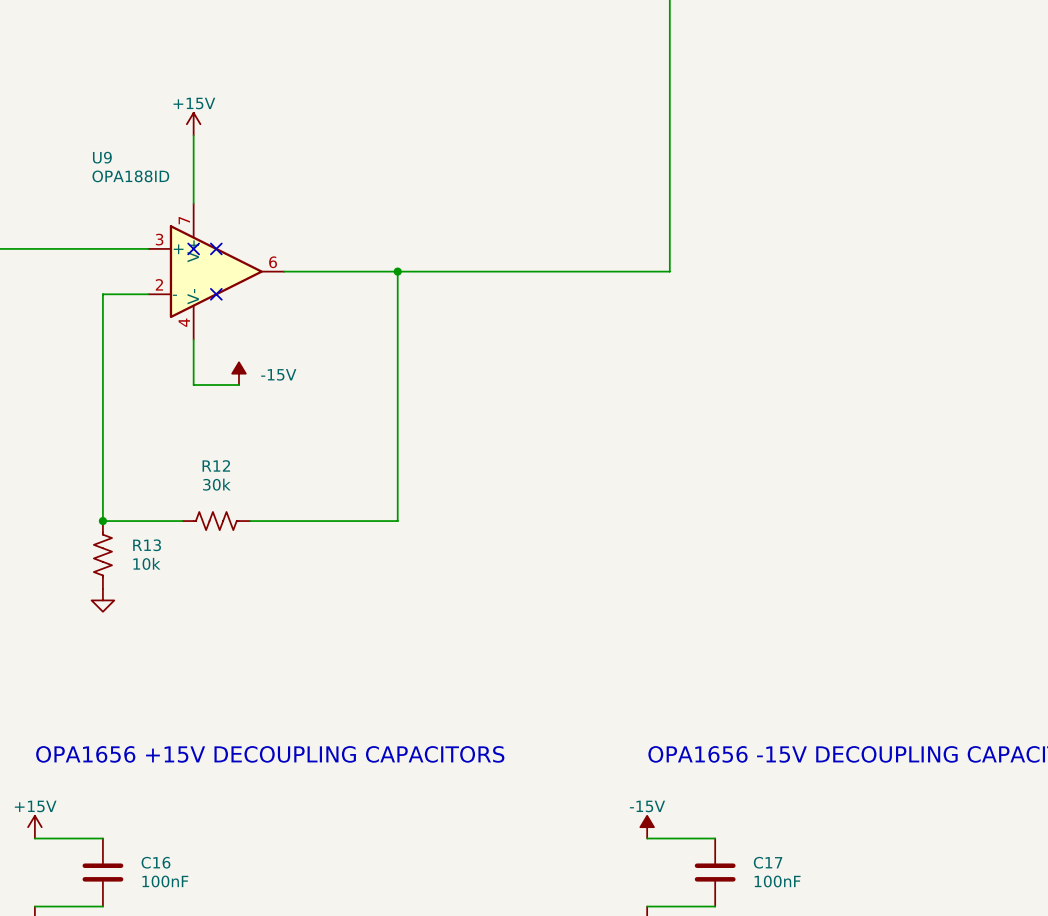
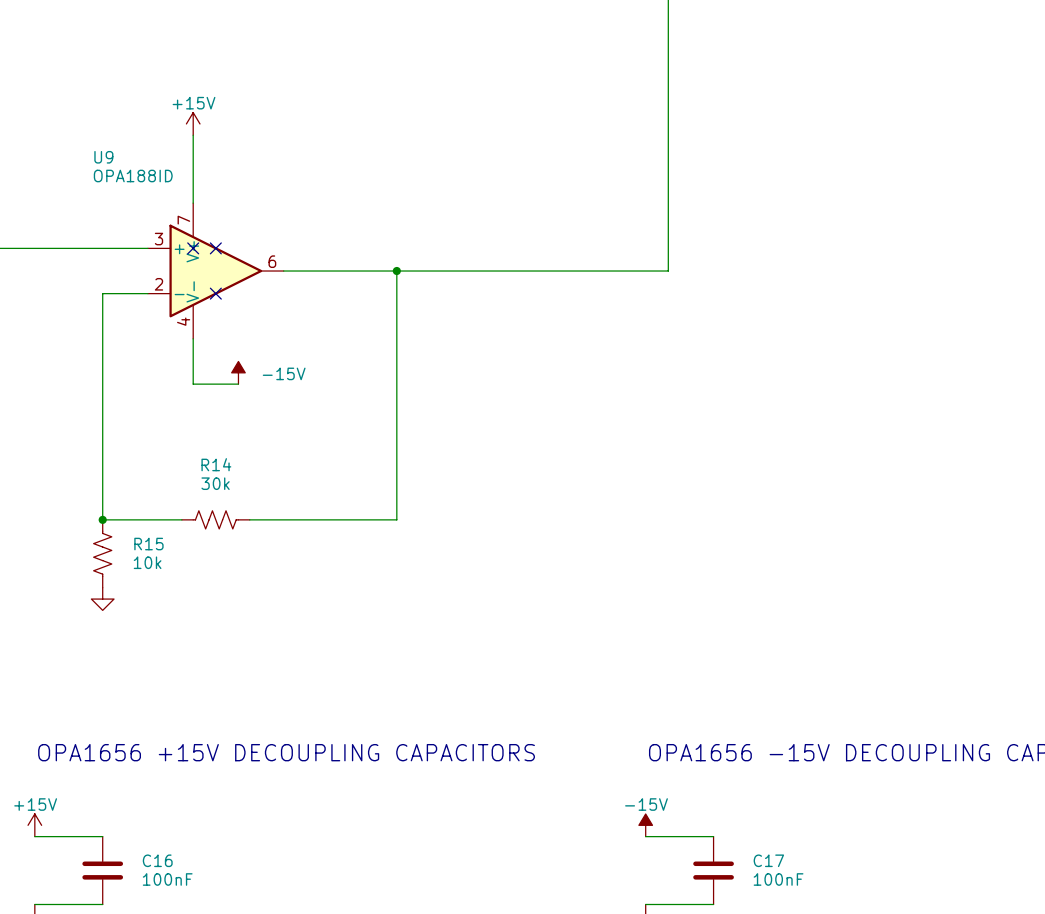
R12 name: R12 (216, 465) -> R14 (216, 464)
R13 name: R13 (147, 545) -> R15 (148, 544)

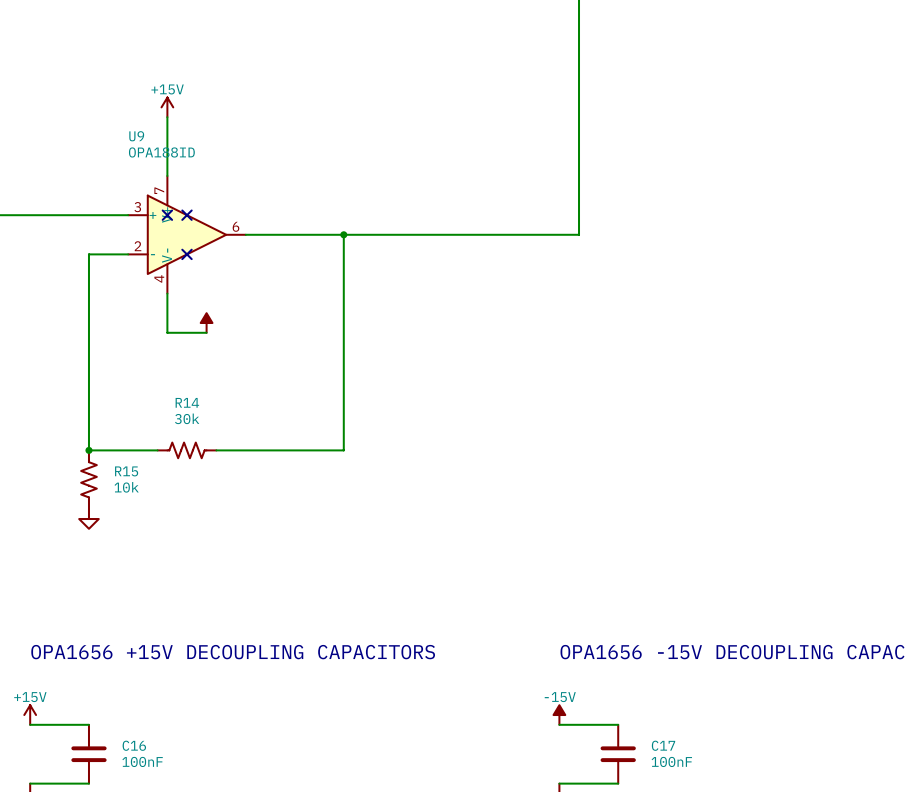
U9 name position: U9 (103, 157) -> U9 (136, 136)
U9 value position: OPA188ID (133, 175) -> OPA188ID (161, 152)
power symbol text: -15V (284, 373) -> none

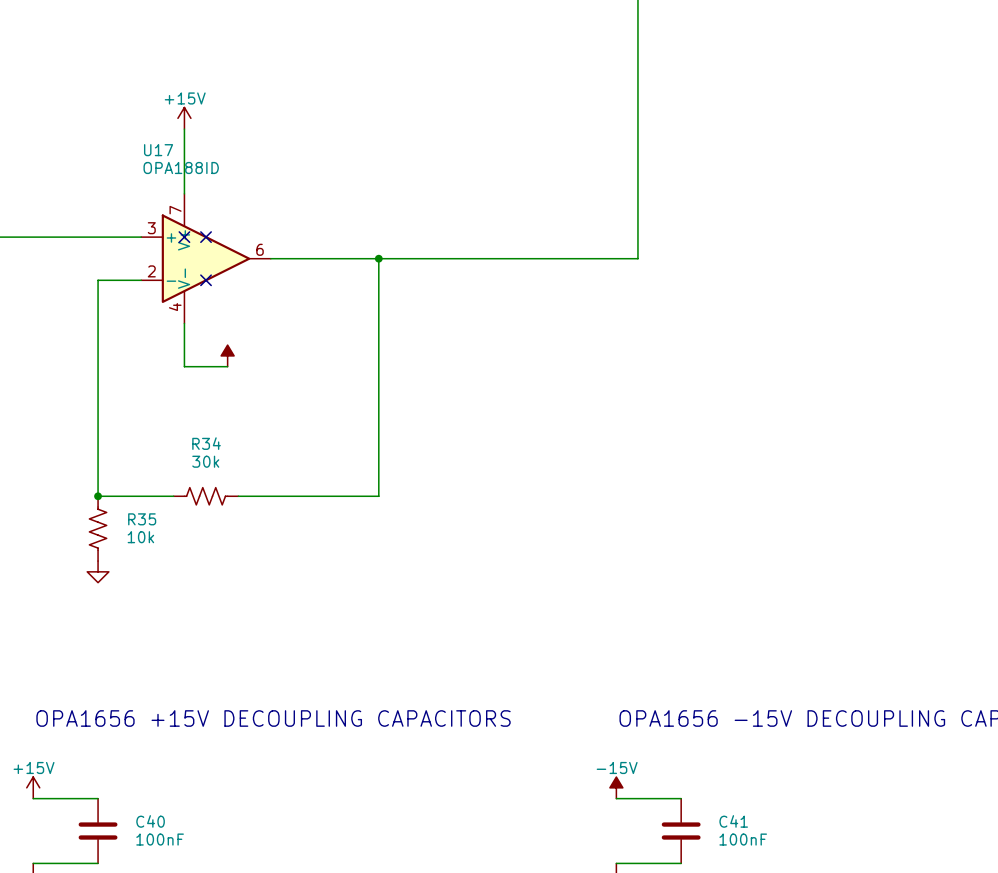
U9 name: U9 (136, 136) -> U17 (158, 150)
R14 name: R14 (187, 402) -> R34 (206, 443)
R15 name: R15 (126, 471) -> R35 (142, 519)
C16 name: C16 (134, 745) -> C40 (150, 821)
C17 name: C17 (663, 745) -> C41 (733, 821)

